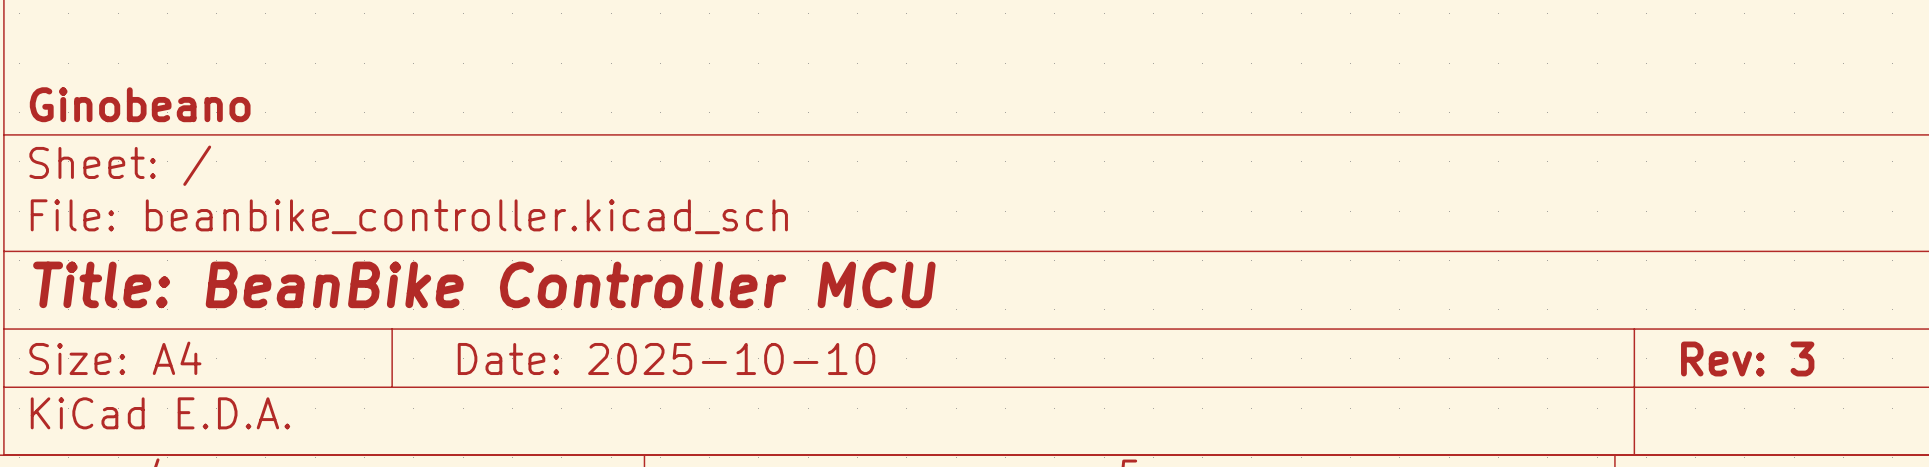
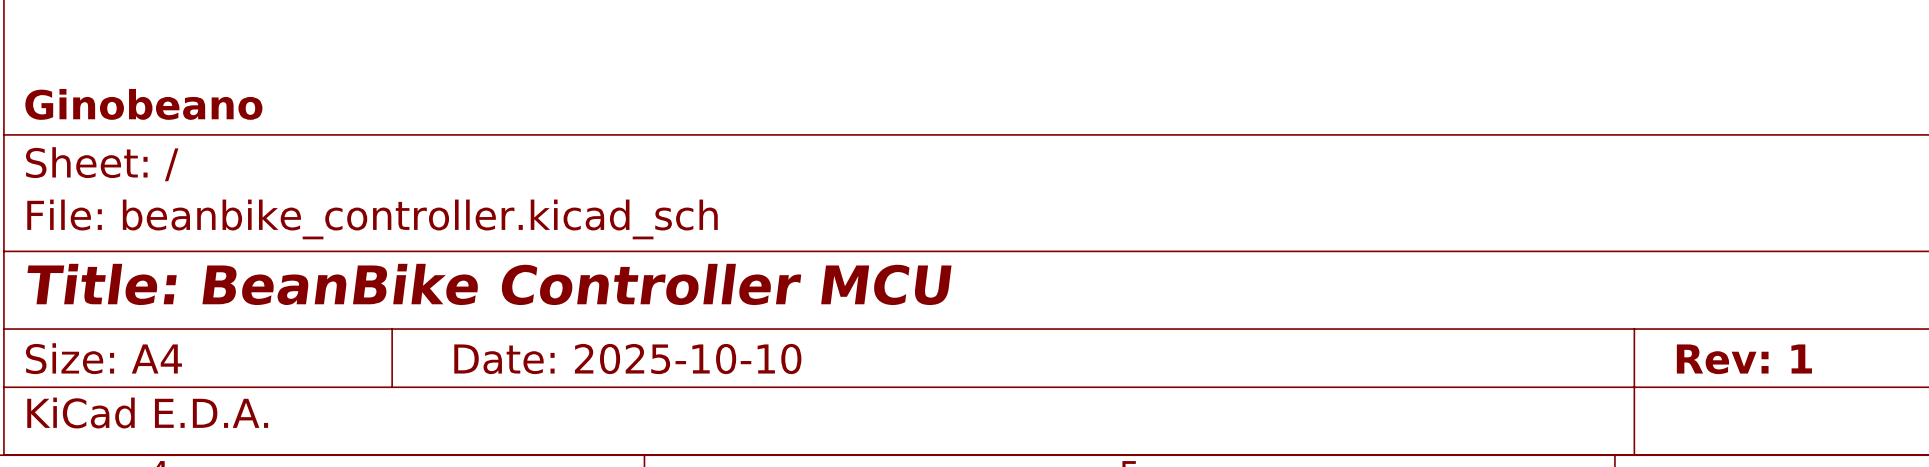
title block: Rev: 3 (1747, 358) -> Rev: 1 (1744, 359)

